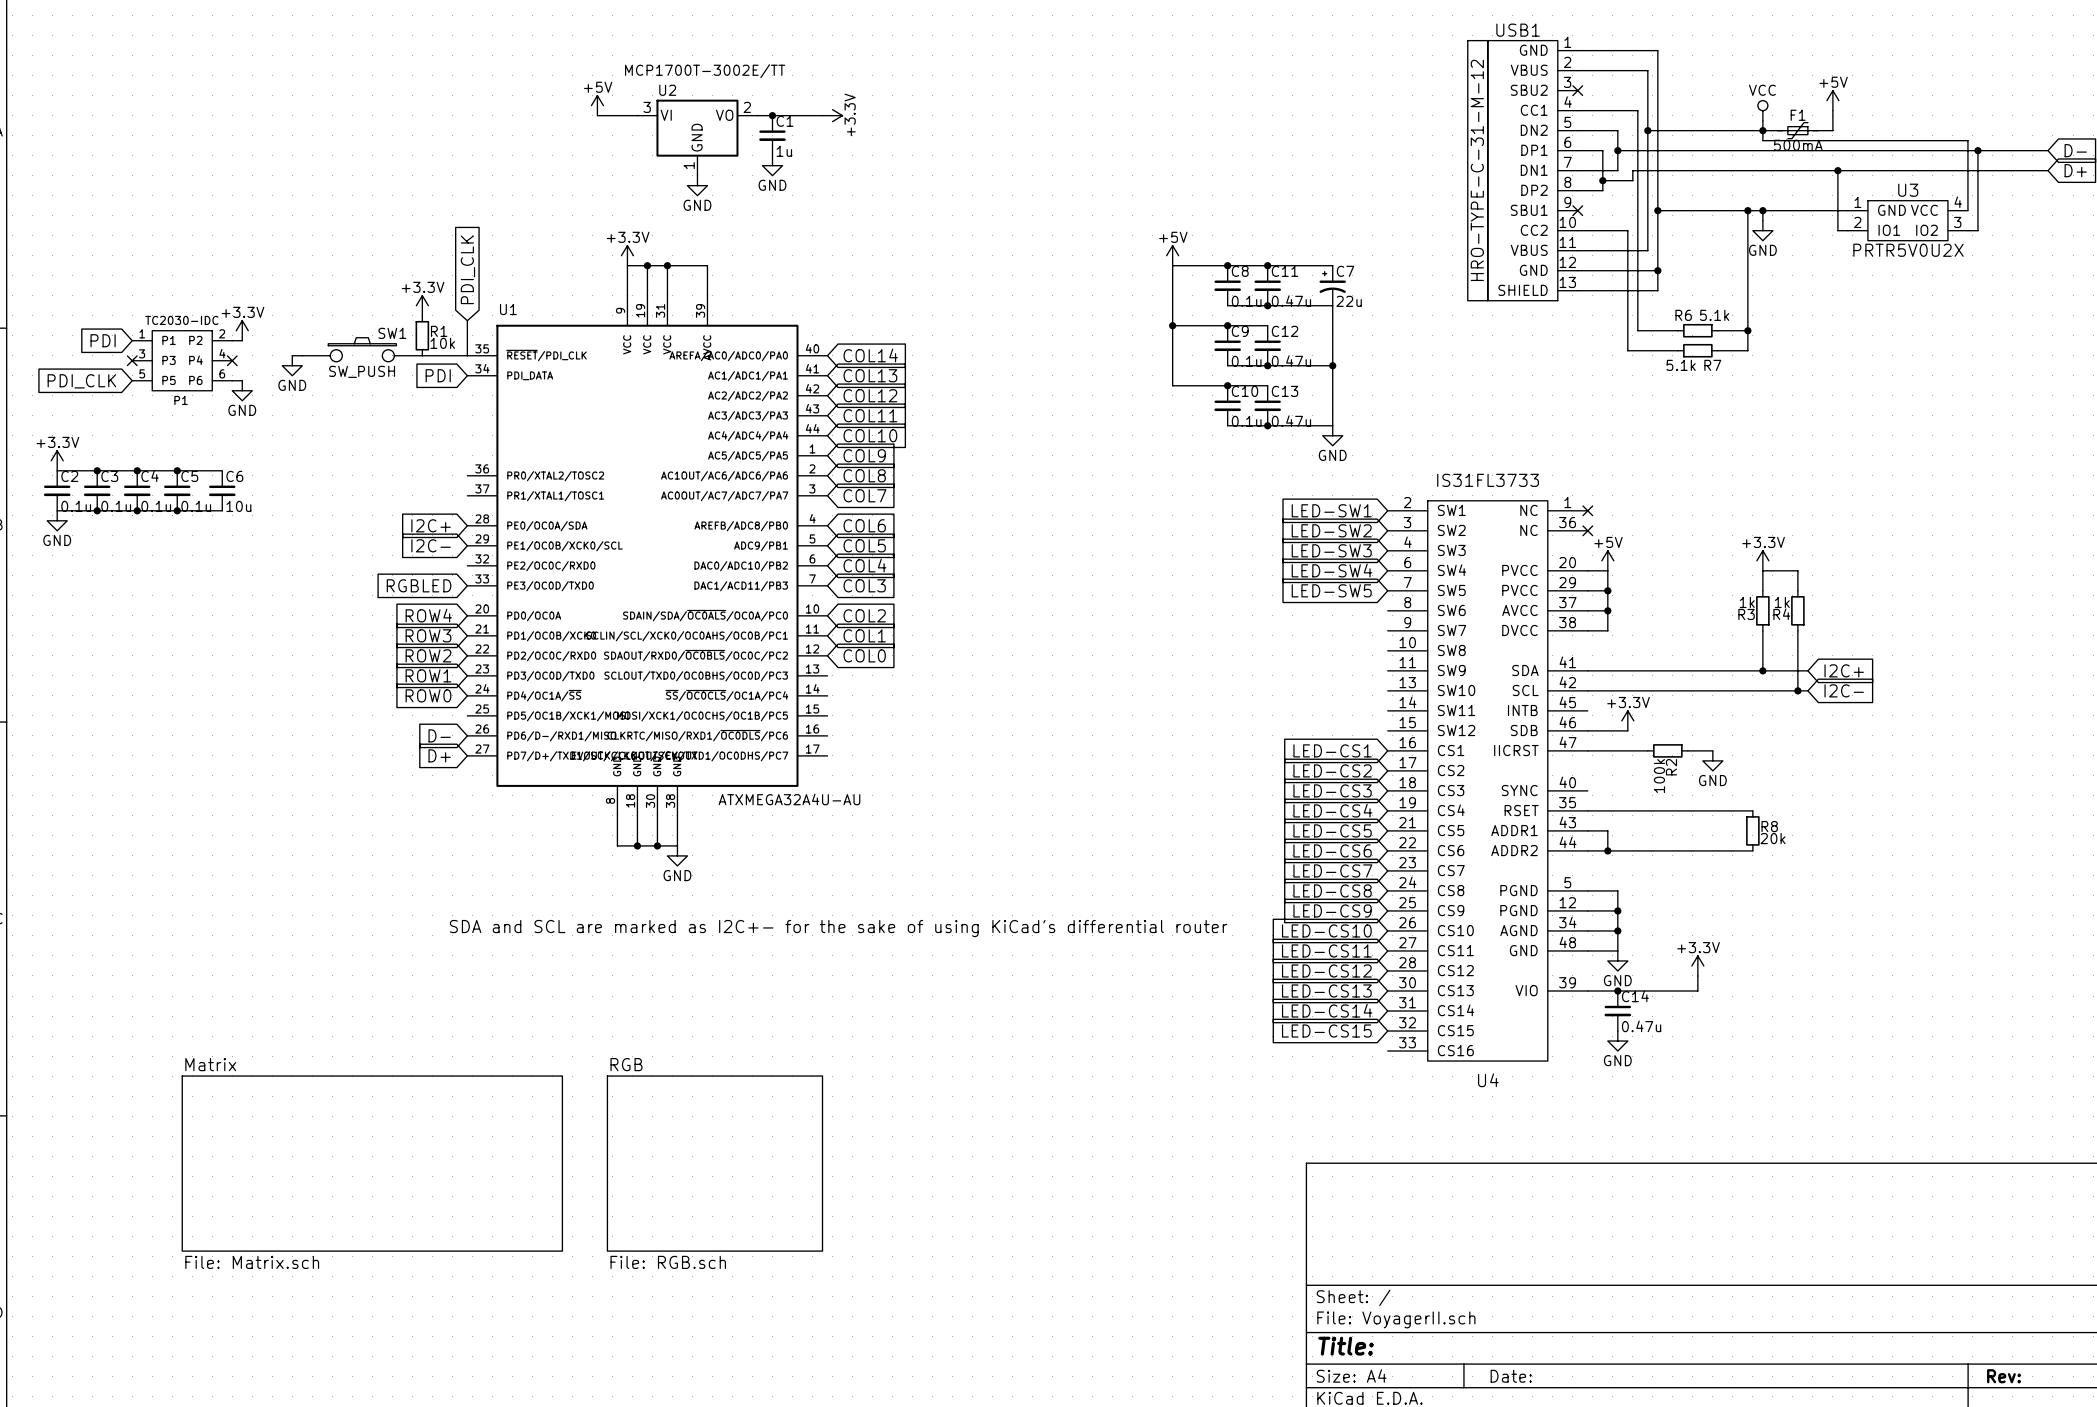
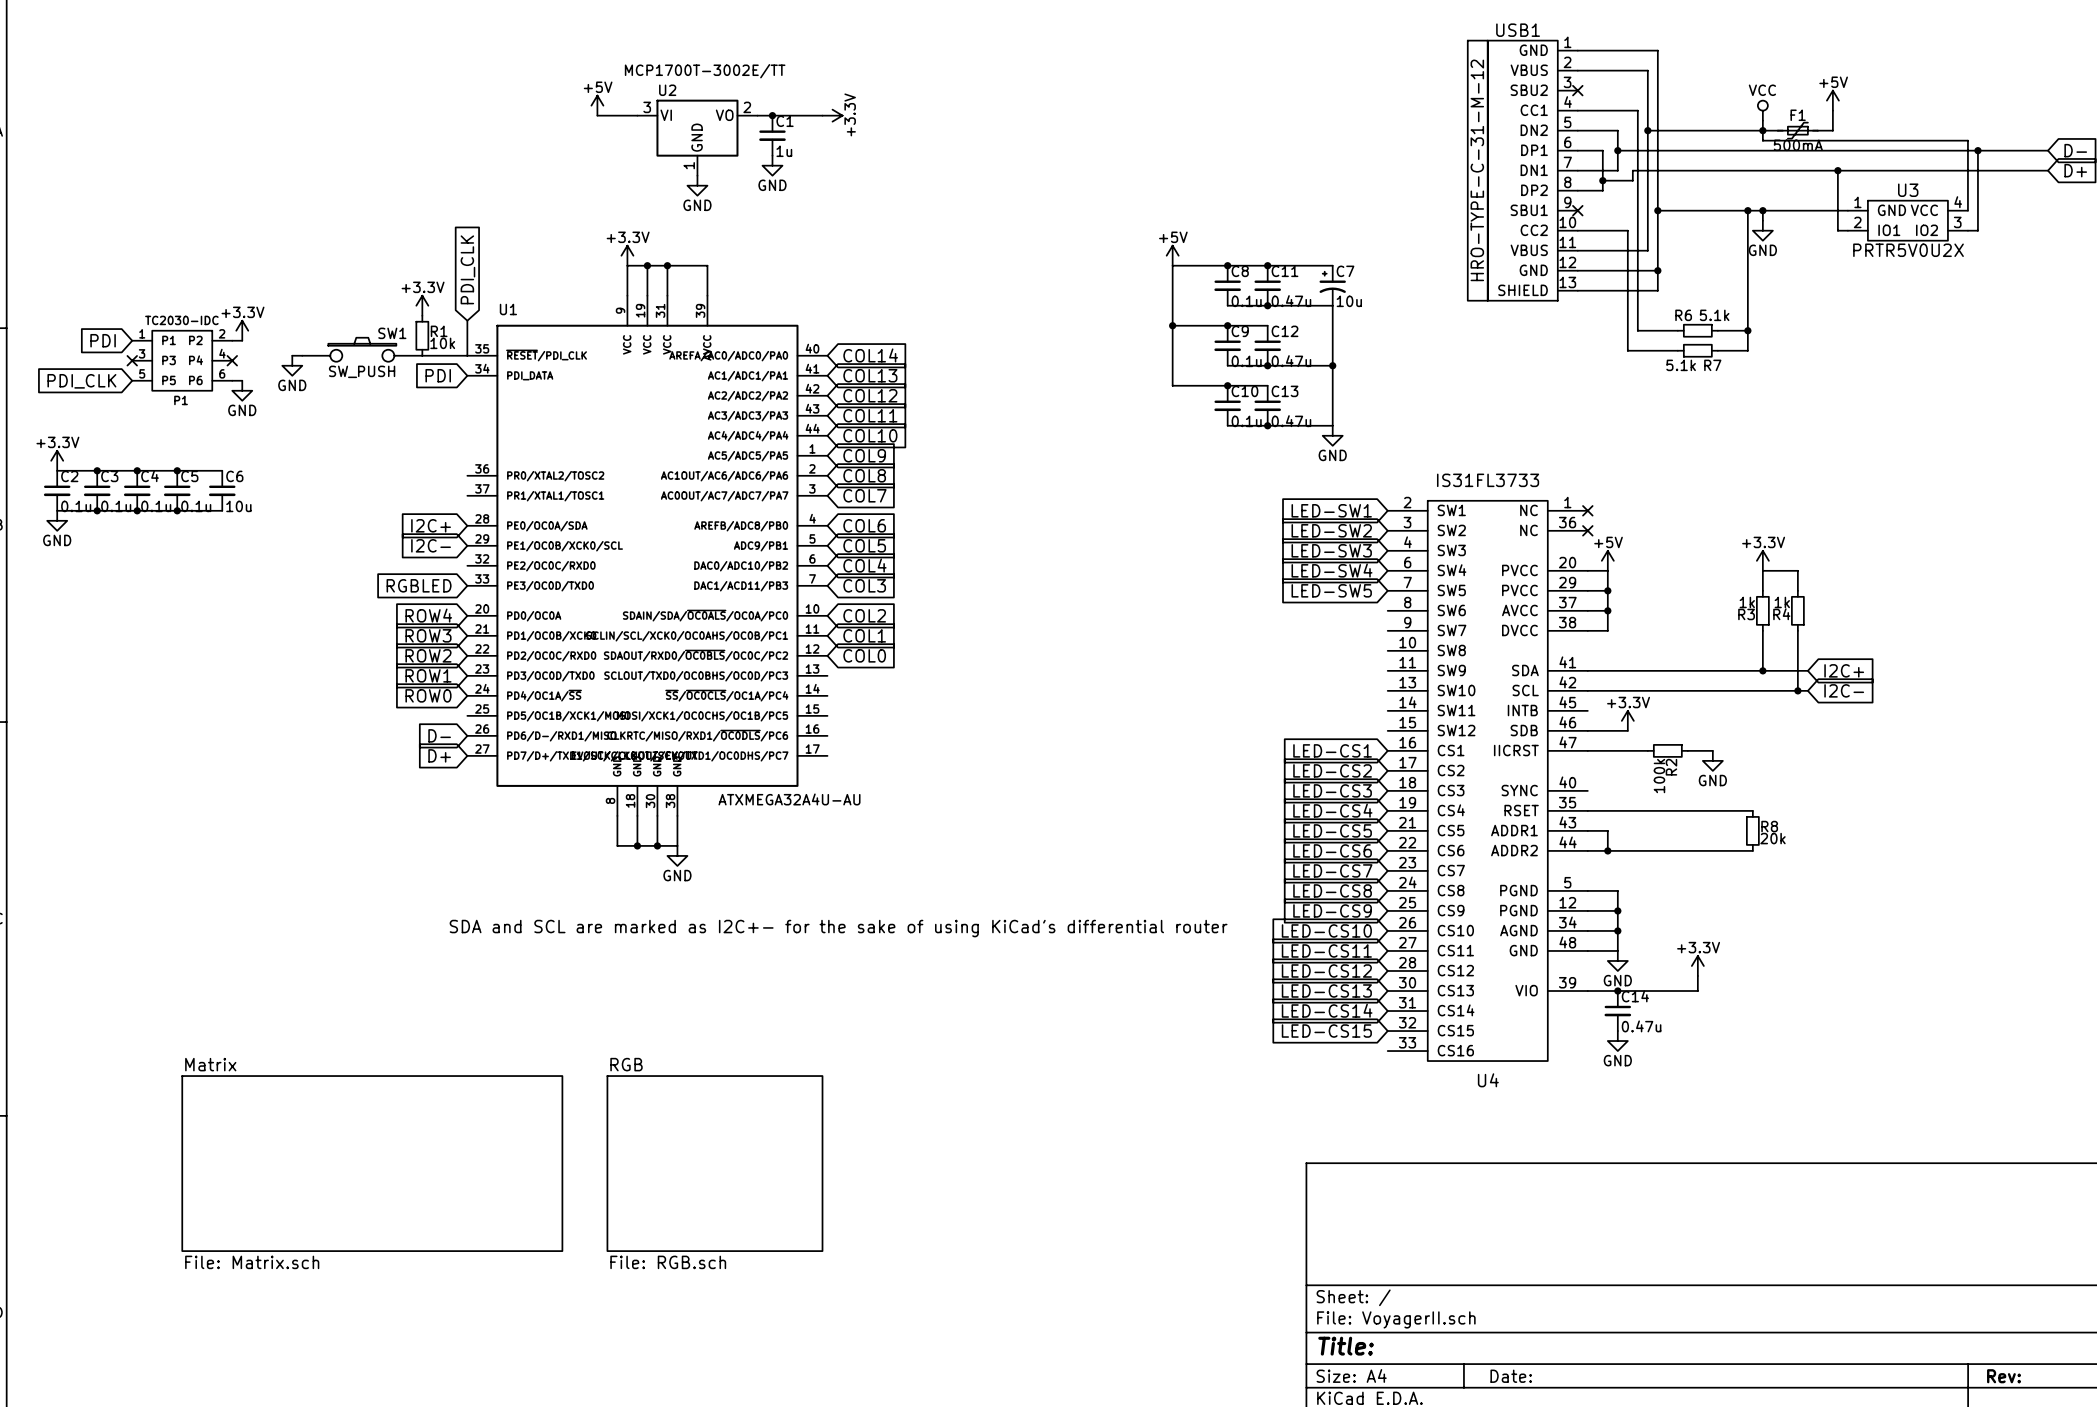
C7 value: 22u (1349, 301) -> 10u (1349, 301)

